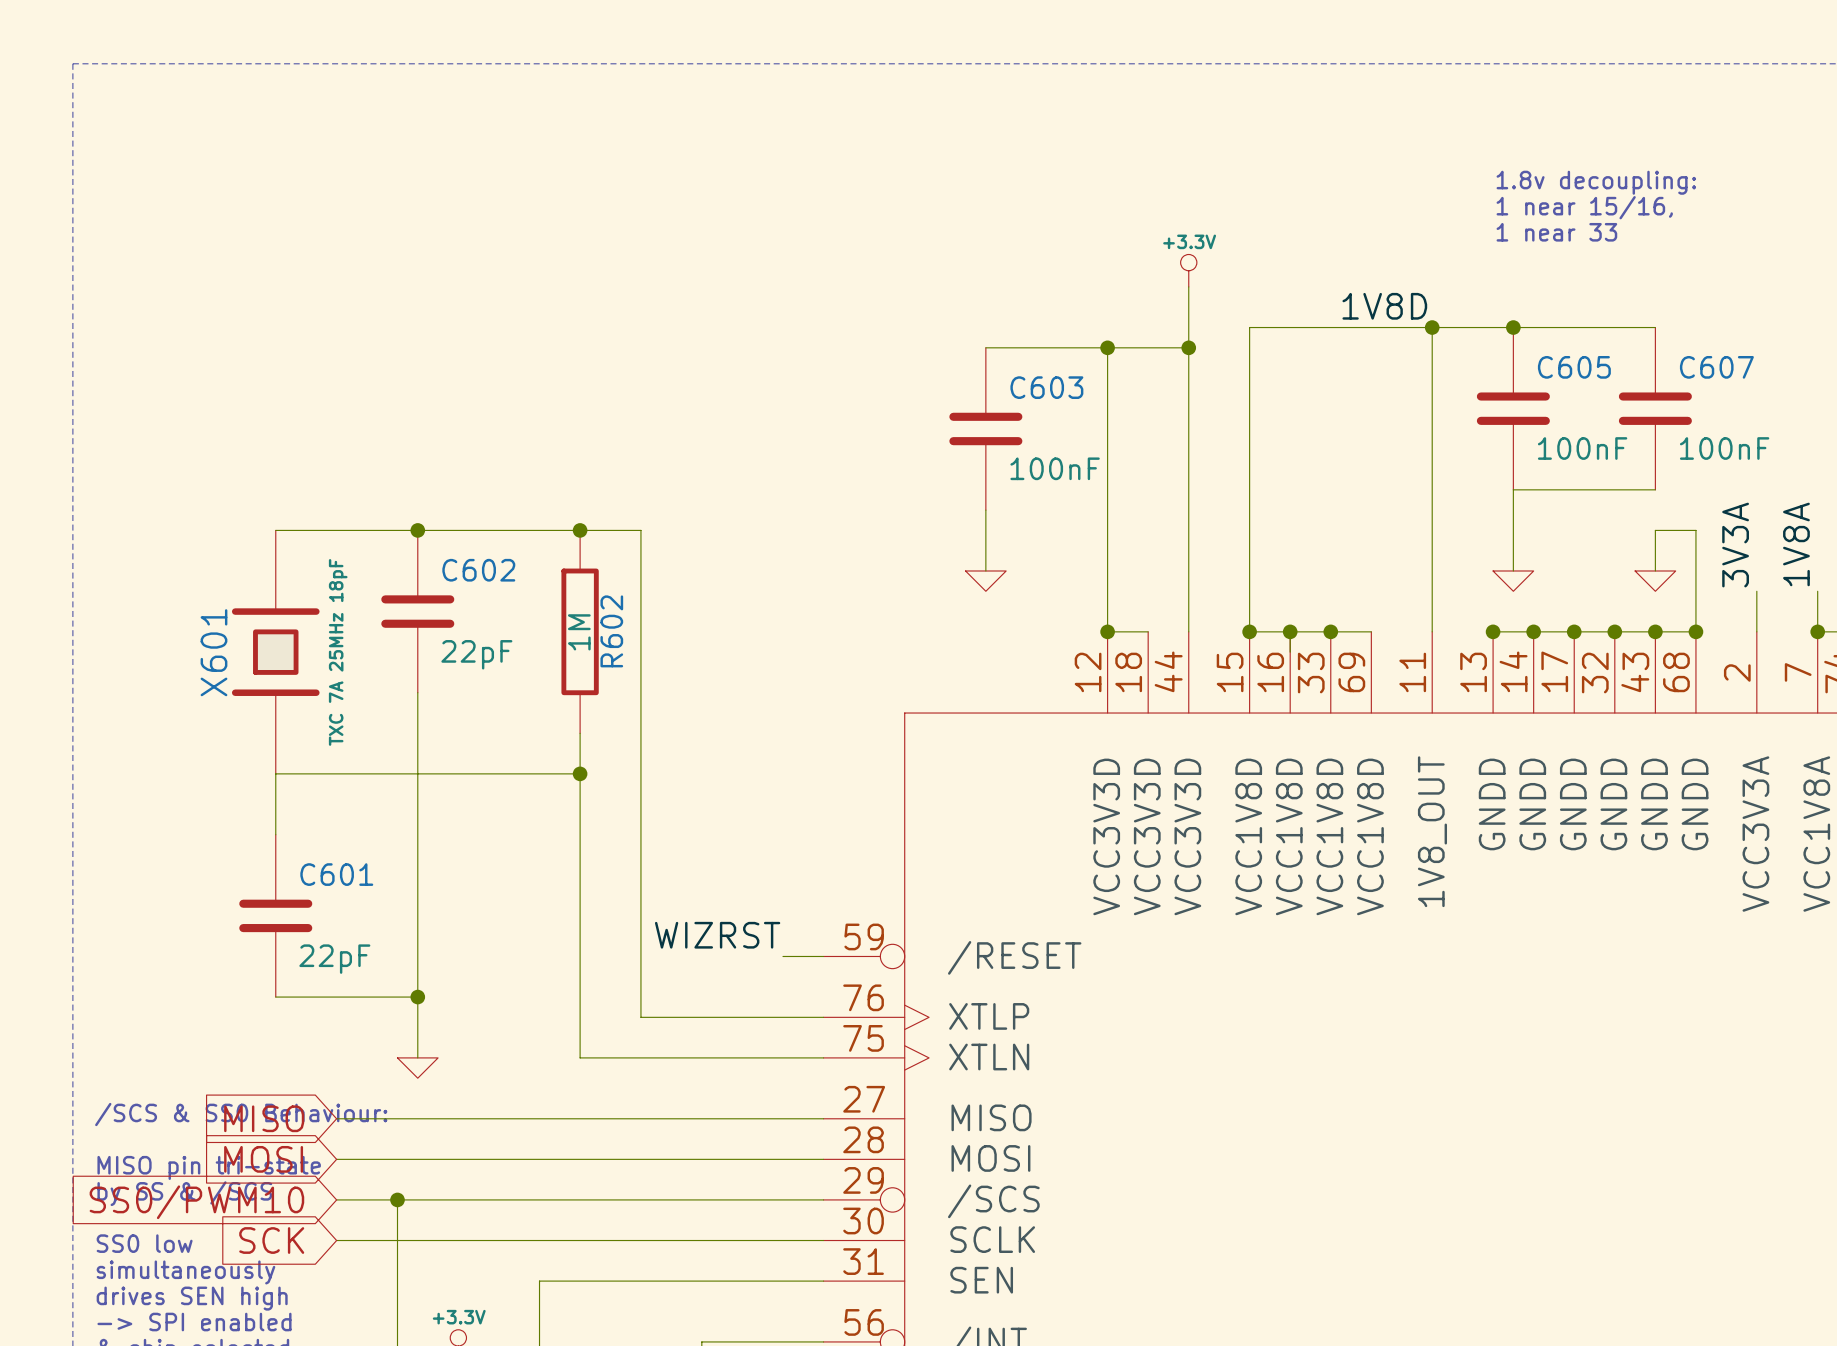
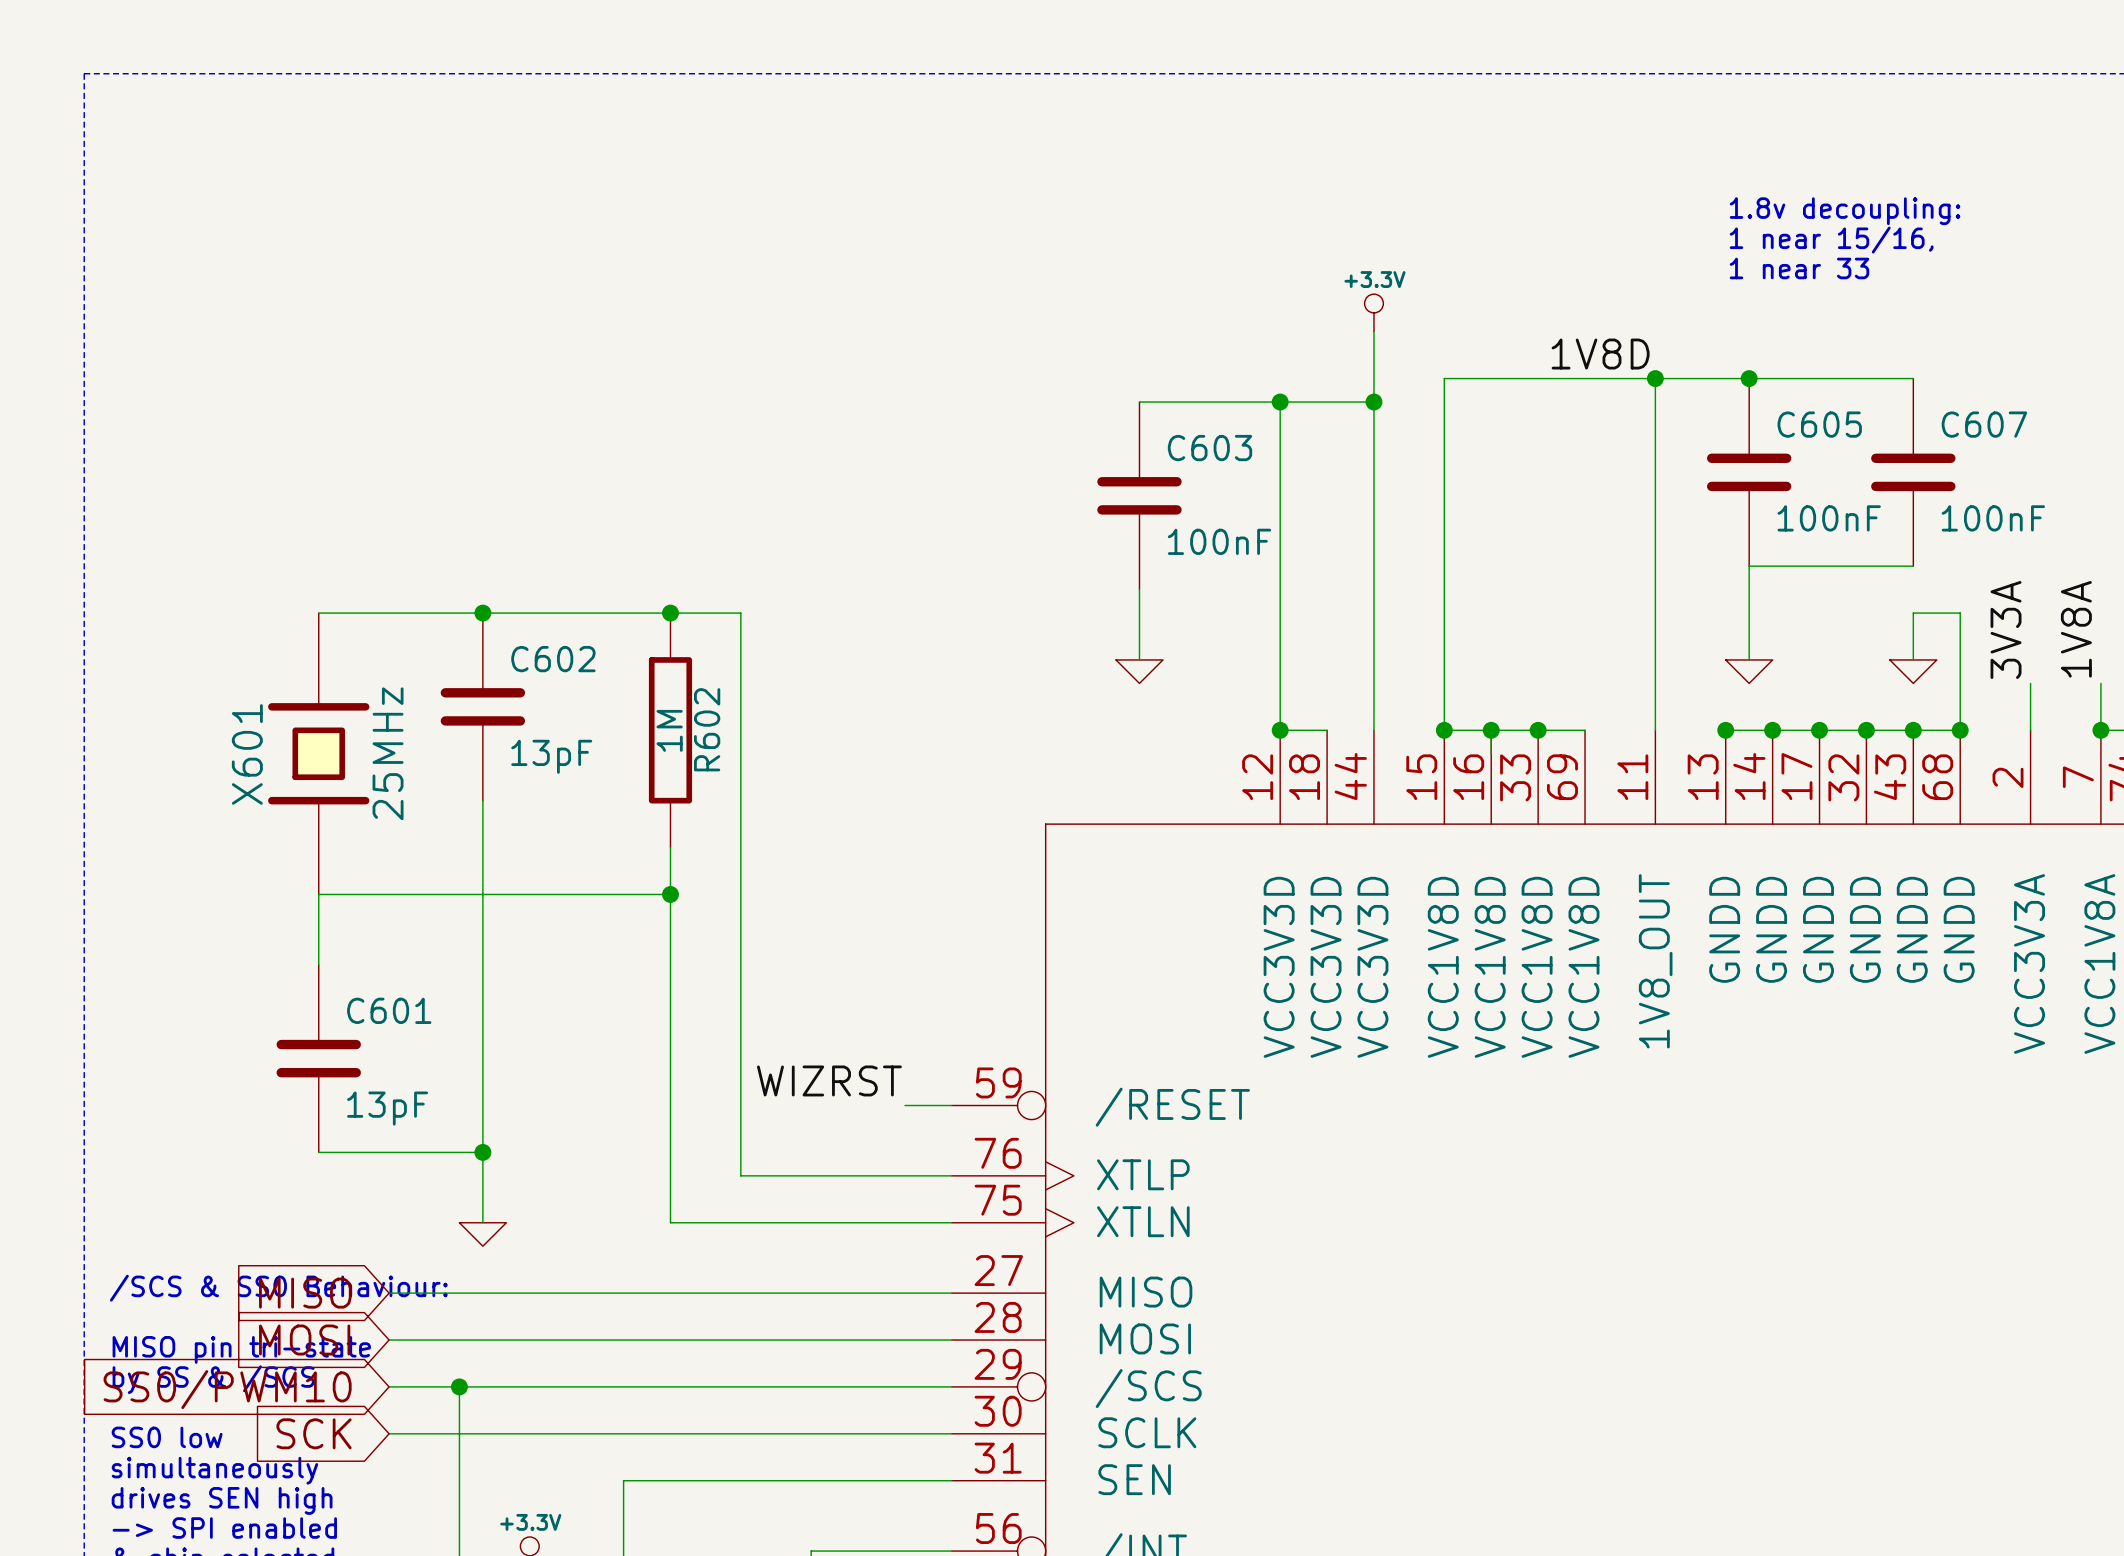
X601 value: TXC 7A 25MHz 18pF (338, 652) -> 25MHz (388, 753)
C602 value: 22pF (476, 654) -> 13pF (551, 756)
C601 value: 22pF (334, 959) -> 13pF (387, 1108)

